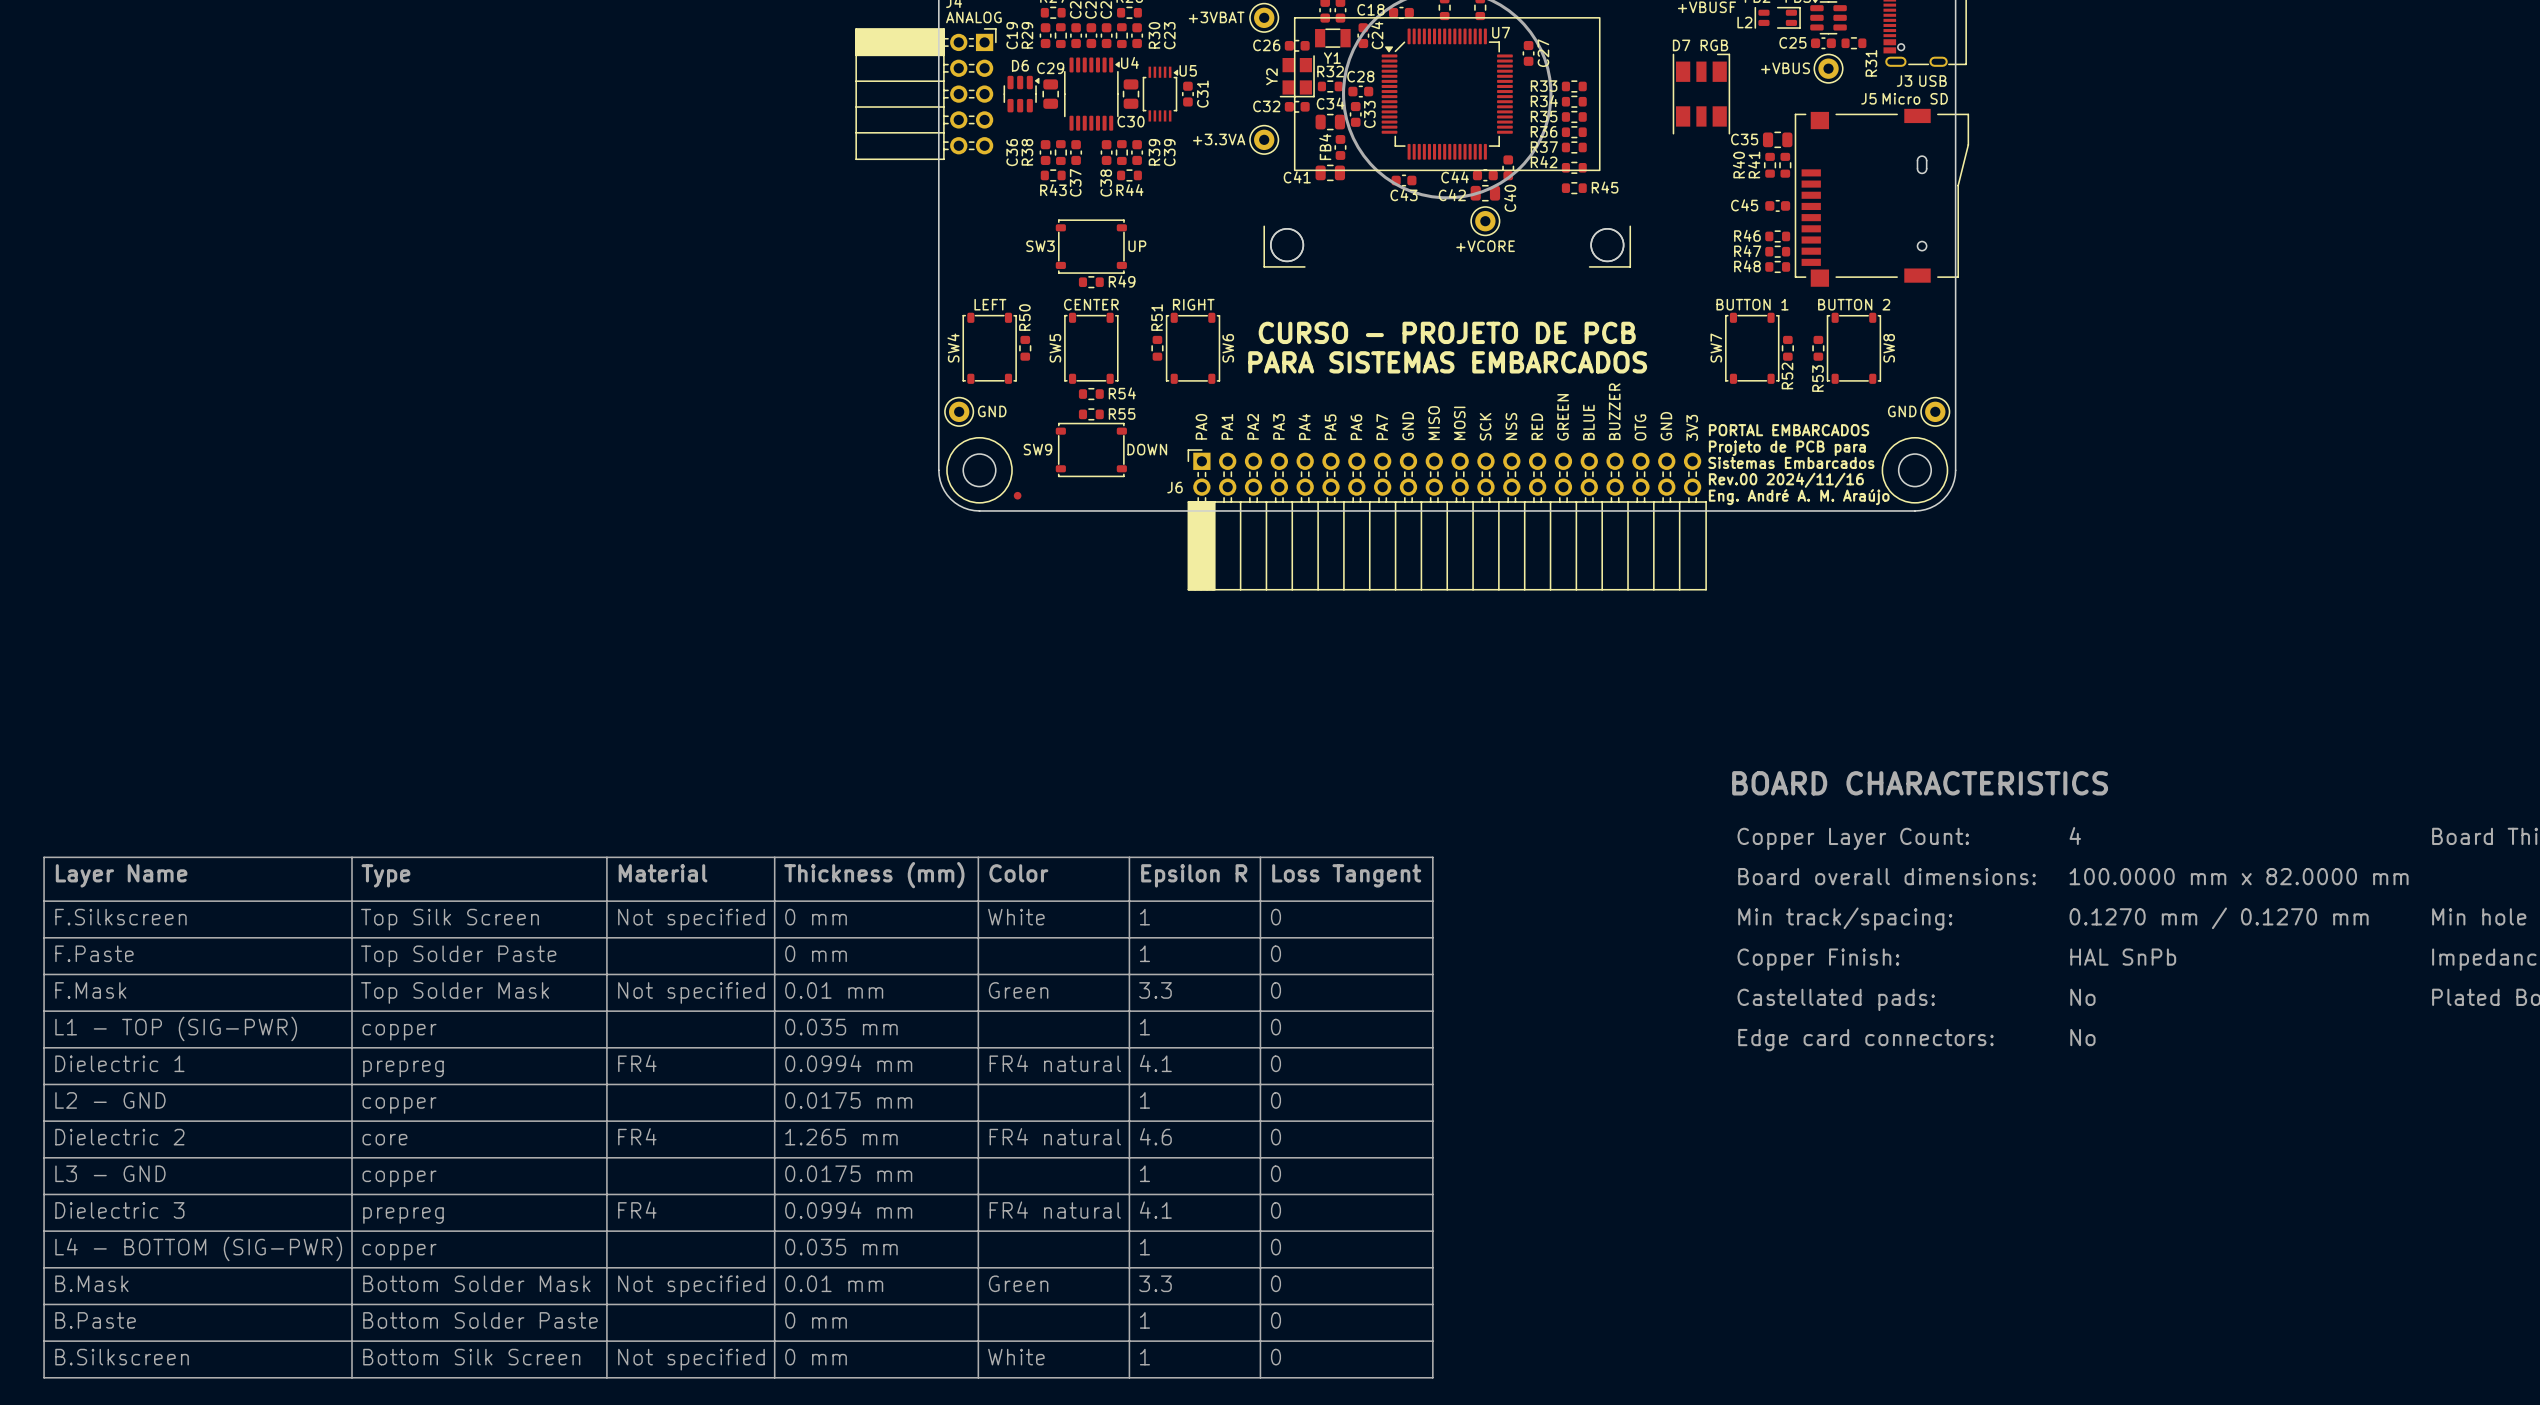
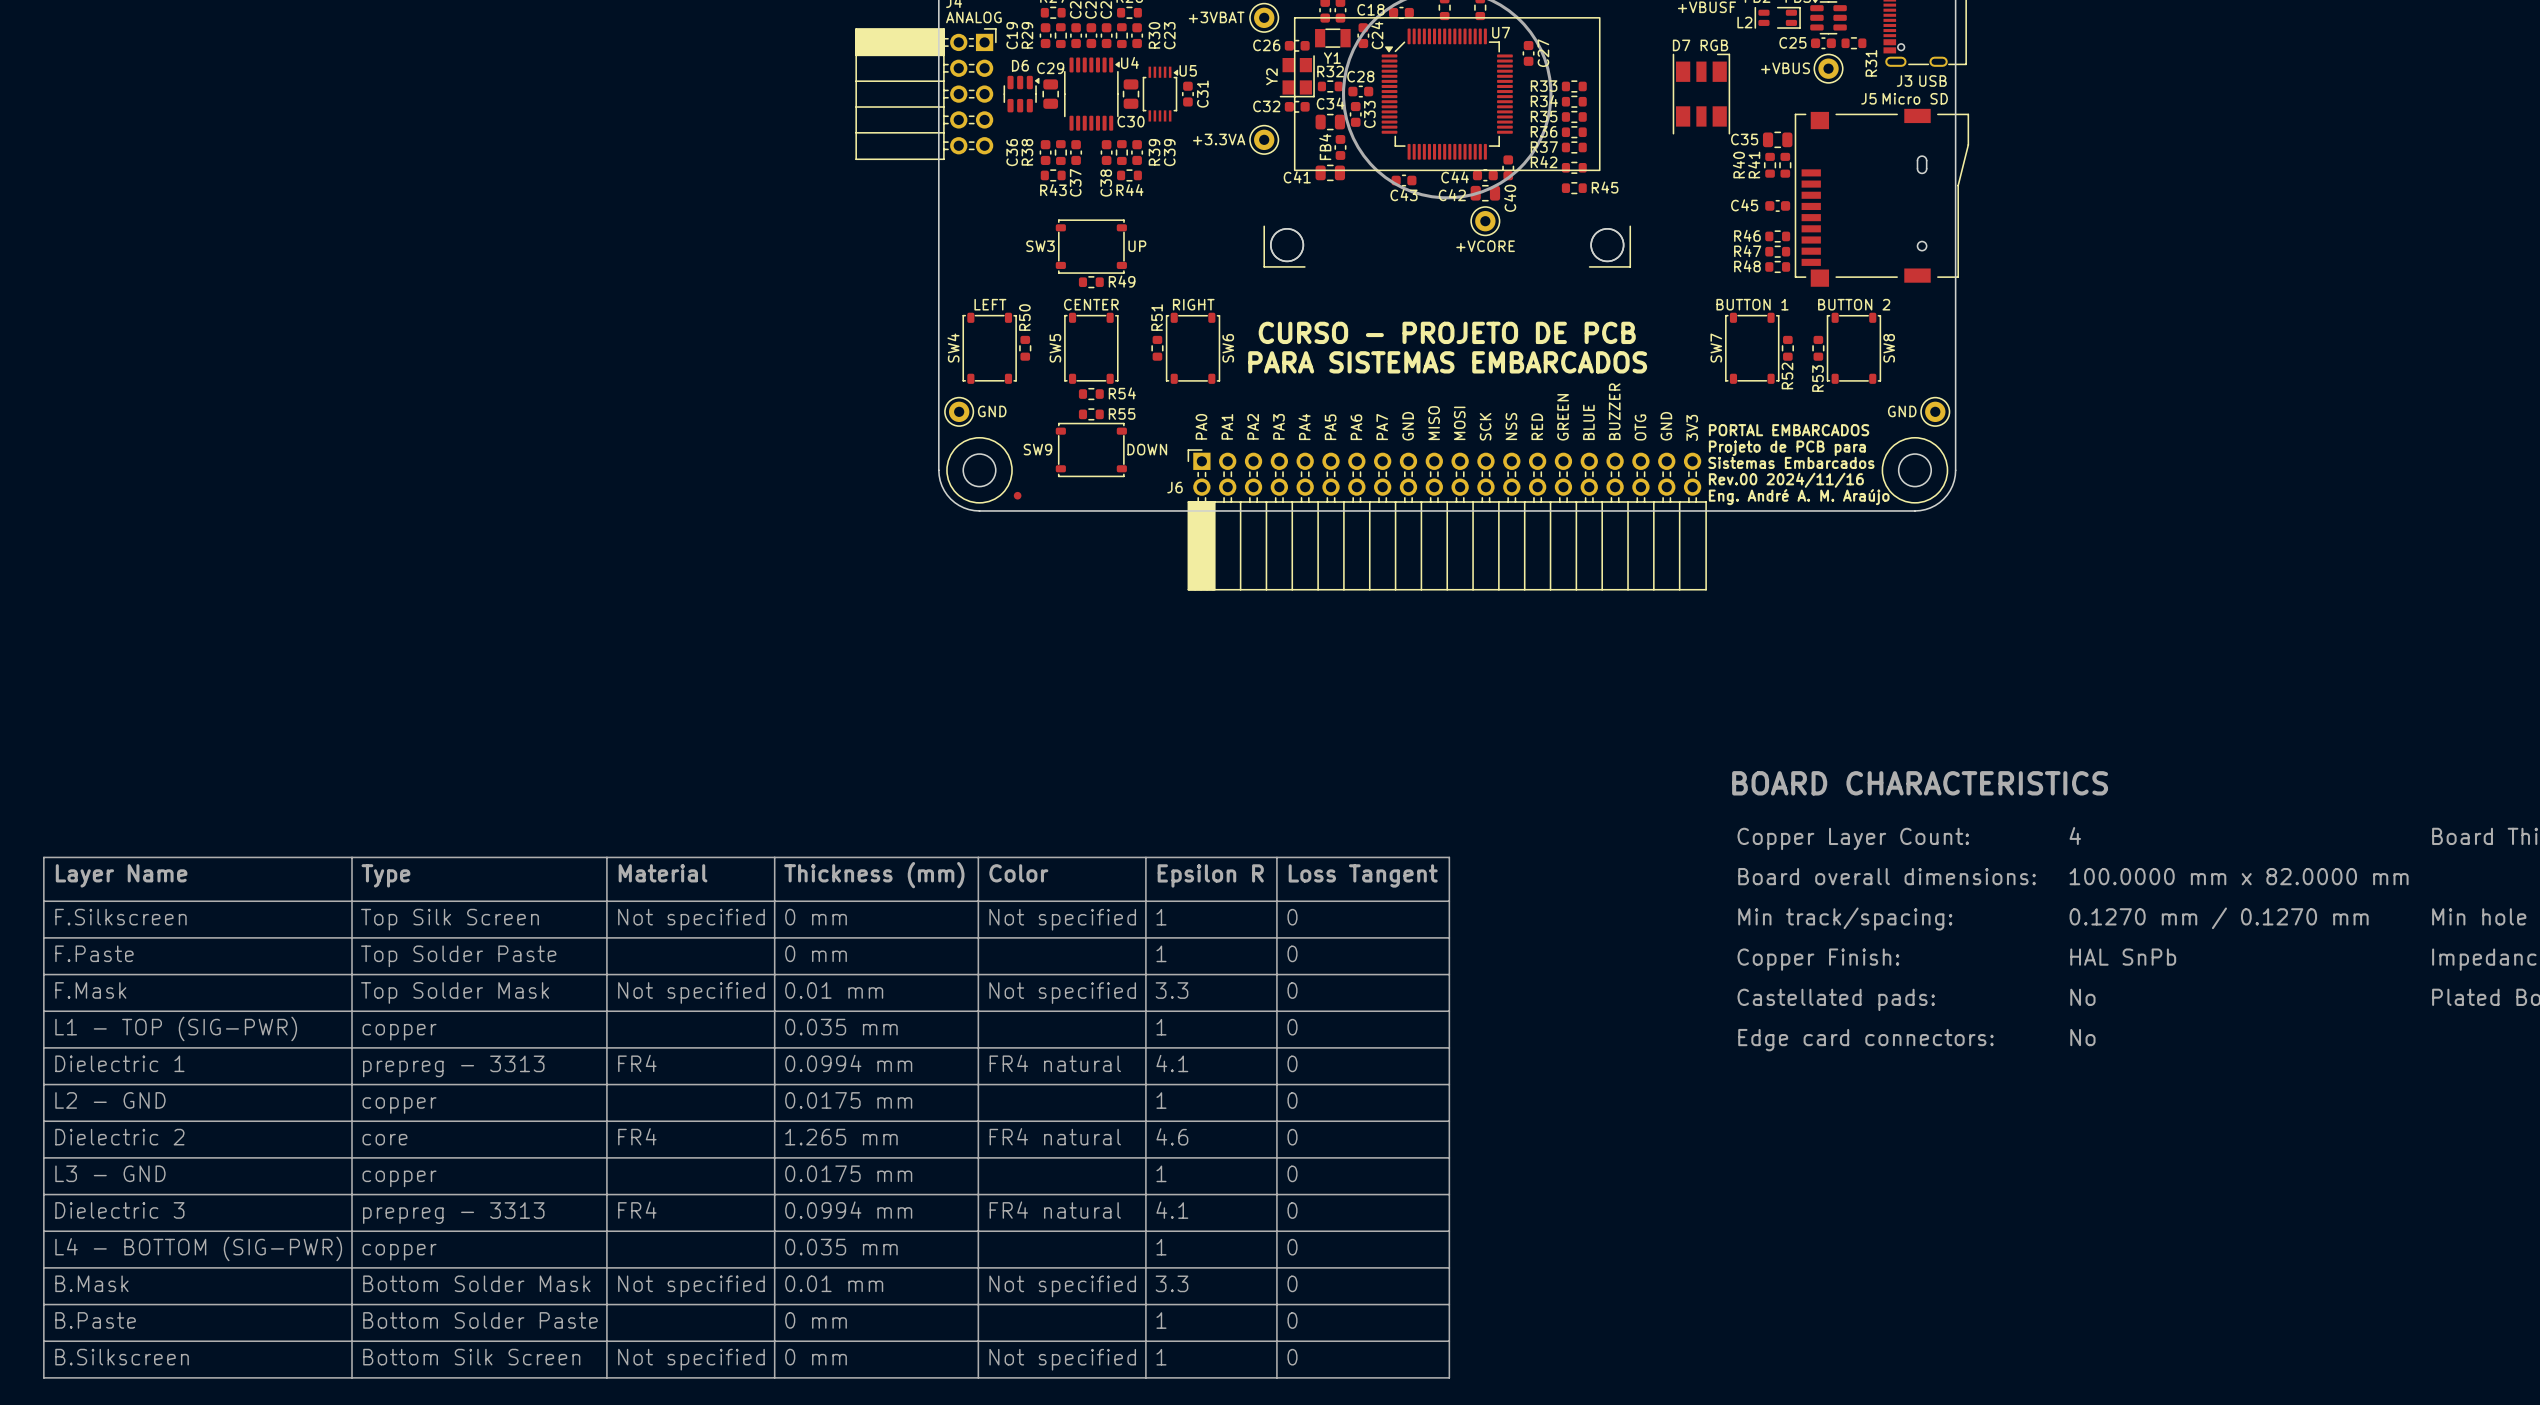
line: (44, 857) (44, 1377) (1432, 1377) (1432, 857) (44, 857) -> (43, 857) (43, 1377) (1449, 1377) (1449, 857) (43, 857)
line: (1129, 857) (1129, 1377) -> (1145, 857) (1145, 1377)
line: (1260, 857) (1260, 1377) -> (1276, 857) (1276, 1377)
text position: Epsilon R (1194, 875) -> Epsilon R (1210, 875)
text position: Loss Tangent (1346, 875) -> Loss Tangent (1363, 875)
line: (44, 901) (1432, 901) -> (43, 901) (1449, 901)
text: White (1016, 917) -> Not specified (1062, 919)
text position: 1 (1144, 917) -> 1 (1161, 917)
text position: 0 (1275, 917) -> 0 (1292, 917)
line: (44, 937) (1432, 937) -> (43, 937) (1449, 937)
text position: 1 (1144, 953) -> 1 (1161, 953)
text position: 0 (1275, 953) -> 0 (1292, 953)
line: (44, 974) (1432, 974) -> (43, 974) (1449, 974)
text: Green (1018, 990) -> Not specified (1062, 993)
text position: 3.3 (1155, 990) -> 3.3 (1172, 990)
text position: 0 (1275, 990) -> 0 (1292, 990)
line: (44, 1011) (1432, 1011) -> (43, 1011) (1449, 1011)
text position: 1 (1144, 1027) -> 1 (1161, 1027)
text position: 0 (1275, 1027) -> 0 (1292, 1027)
line: (44, 1047) (1432, 1047) -> (43, 1047) (1449, 1047)
text position: 4.1 (1155, 1063) -> 4.1 (1172, 1063)
text position: 0 (1275, 1063) -> 0 (1292, 1063)
text: prepreg (403, 1068) -> prepreg - 3313 (453, 1066)
line: (44, 1084) (1432, 1084) -> (43, 1084) (1449, 1084)
text position: 1 (1144, 1100) -> 1 (1161, 1100)
text position: 0 (1275, 1100) -> 0 (1292, 1100)
line: (44, 1121) (1432, 1121) -> (43, 1121) (1449, 1121)
text position: 4.6 (1155, 1136) -> 4.6 (1172, 1136)
text position: 0 (1275, 1137) -> 0 (1292, 1137)
line: (44, 1157) (1432, 1157) -> (43, 1157) (1449, 1157)
text position: 1 (1144, 1173) -> 1 (1161, 1173)
text position: 0 (1275, 1173) -> 0 (1292, 1173)
line: (44, 1194) (1432, 1194) -> (43, 1194) (1449, 1194)
text position: 4.1 (1155, 1210) -> 4.1 (1172, 1210)
text position: 0 (1275, 1210) -> 0 (1292, 1210)
text: prepreg (403, 1215) -> prepreg - 3313 (453, 1213)
line: (44, 1231) (1432, 1231) -> (43, 1231) (1449, 1231)
text position: 1 (1144, 1247) -> 1 (1161, 1247)
text position: 0 (1275, 1247) -> 0 (1292, 1247)
line: (44, 1267) (1432, 1267) -> (43, 1267) (1449, 1267)
text: Green (1018, 1283) -> Not specified (1062, 1286)
text position: 3.3 (1155, 1283) -> 3.3 (1172, 1283)
text position: 0 (1275, 1283) -> 0 (1292, 1283)
line: (44, 1304) (1432, 1304) -> (43, 1304) (1449, 1304)
text position: 1 (1144, 1320) -> 1 (1161, 1320)
text position: 0 (1275, 1320) -> 0 (1292, 1320)
line: (44, 1341) (1432, 1341) -> (43, 1341) (1449, 1341)
text: White (1016, 1357) -> Not specified (1062, 1359)
text position: 1 (1144, 1357) -> 1 (1161, 1357)
text position: 0 (1275, 1357) -> 0 (1292, 1357)

